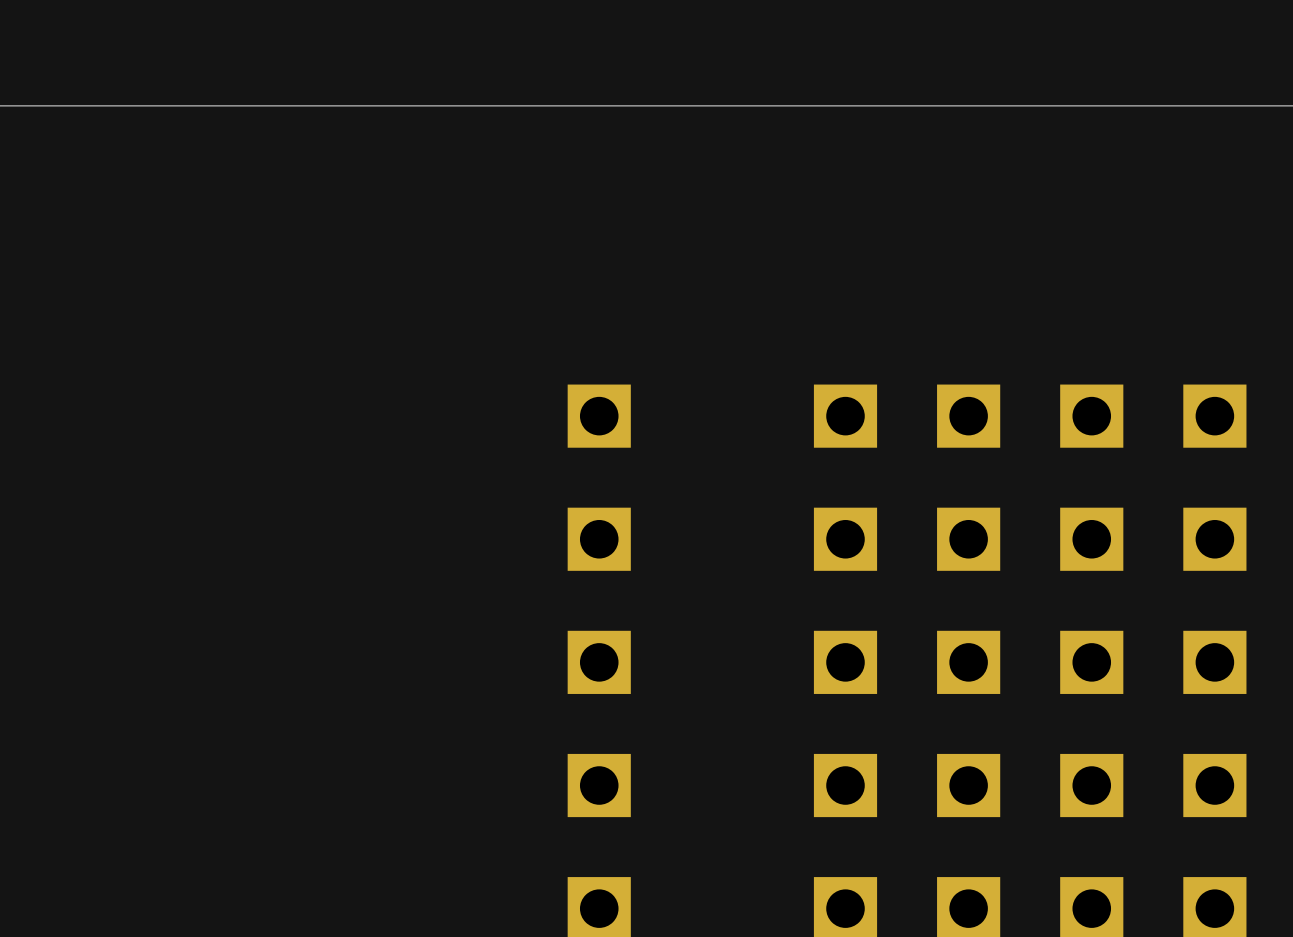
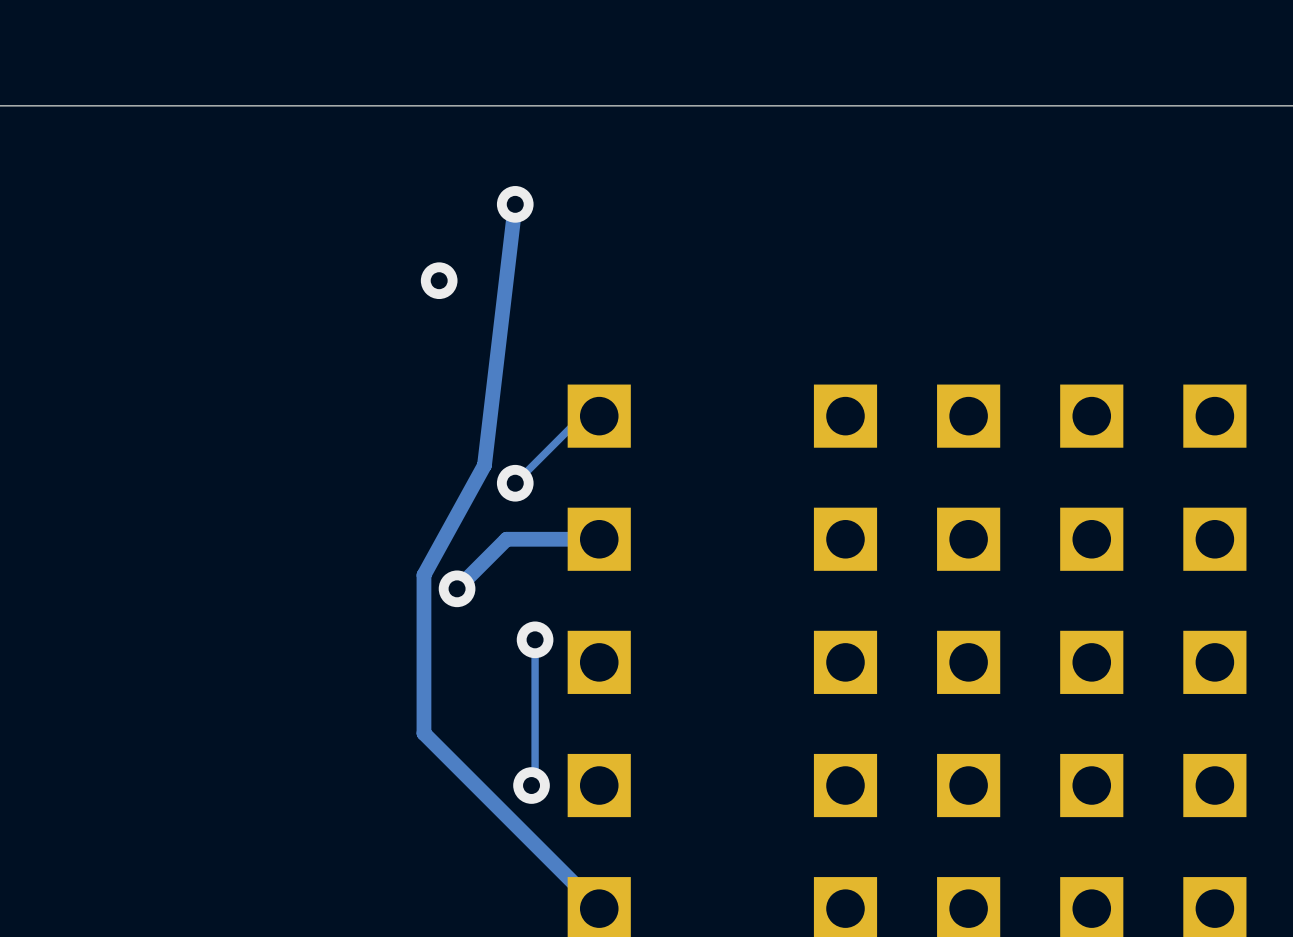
track: none -> (515, 204) (484, 465) (423, 575) (423, 733) (599, 908)
via: none -> (515, 204)
via: none -> (439, 280)
track: none -> (599, 416) (582, 416) (515, 483)
via: none -> (515, 483)
track: none -> (599, 539) (506, 539) (457, 588)
via: none -> (457, 588)
track: none -> (535, 639) (535, 781) (531, 785)
via: none -> (535, 639)
via: none -> (531, 785)

